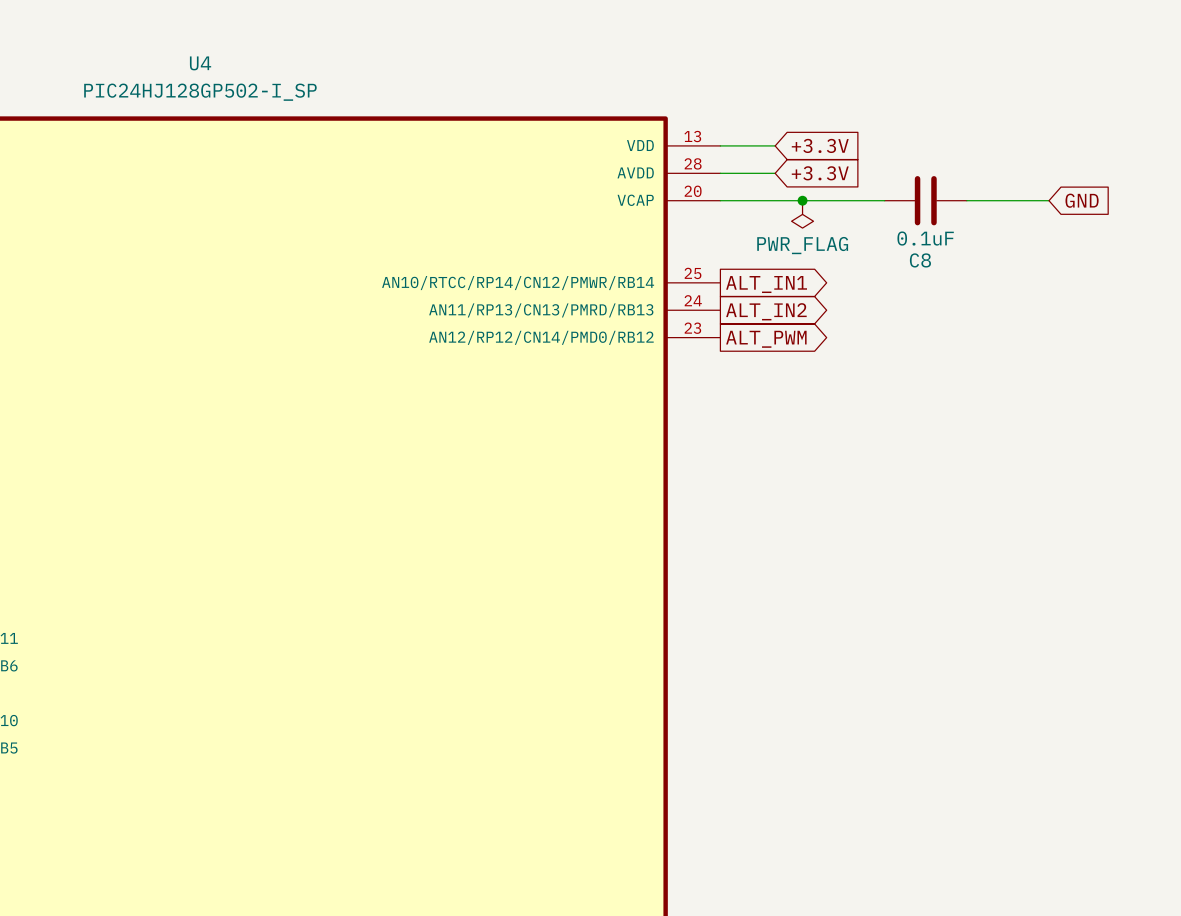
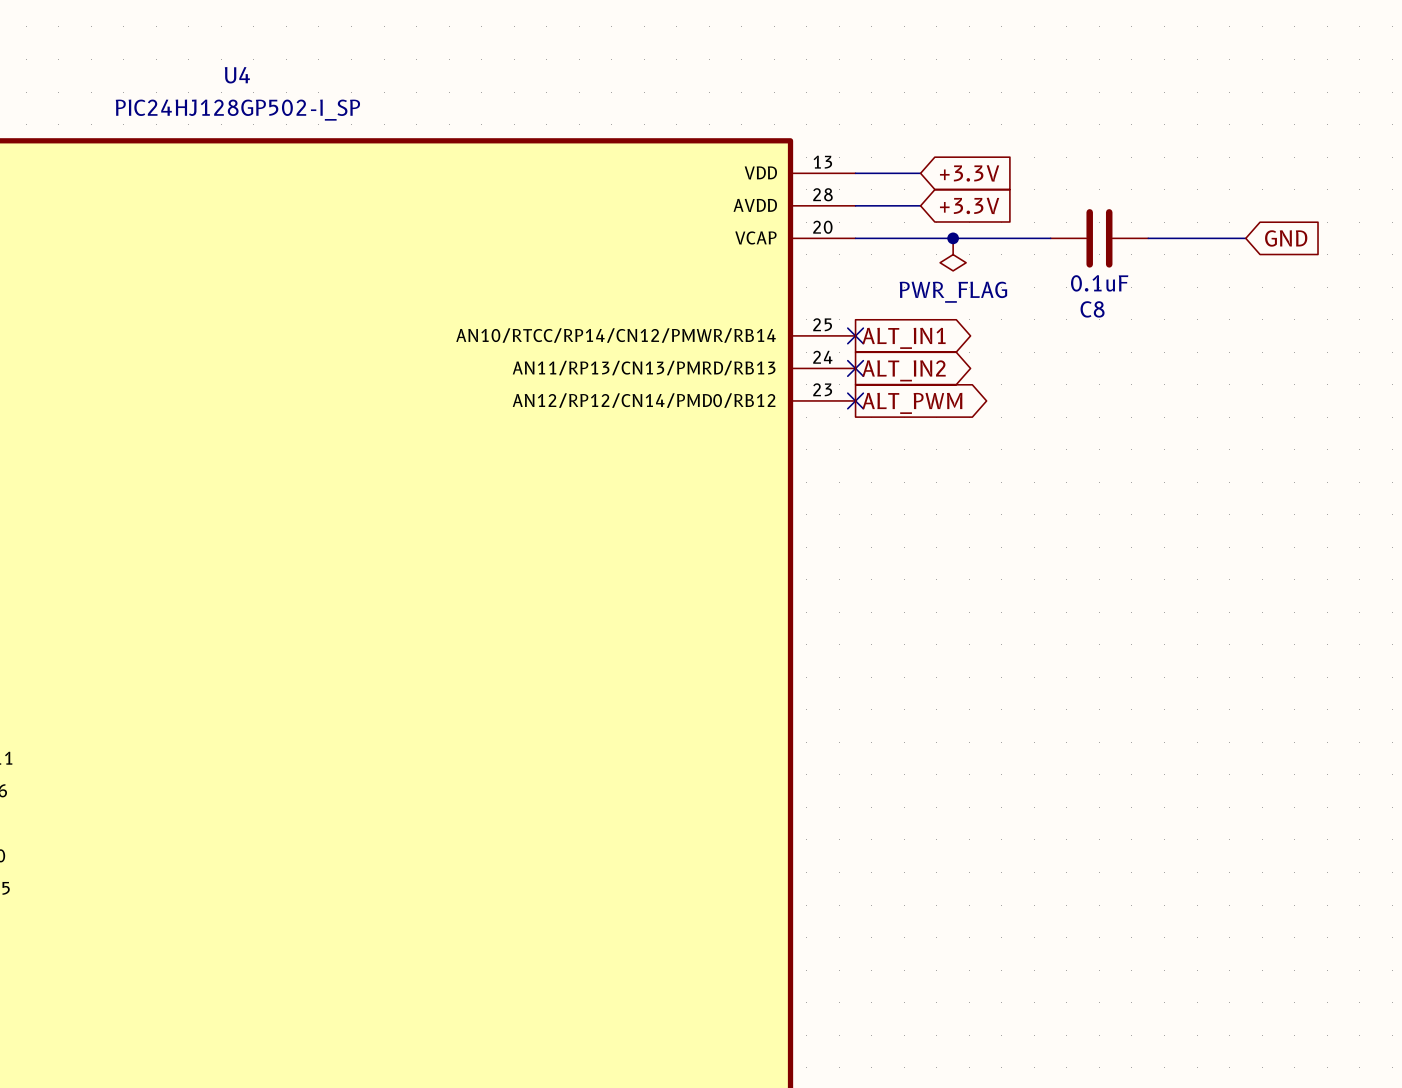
no-connect mark: none -> (855, 335)
no-connect mark: none -> (855, 368)
no-connect mark: none -> (855, 400)

